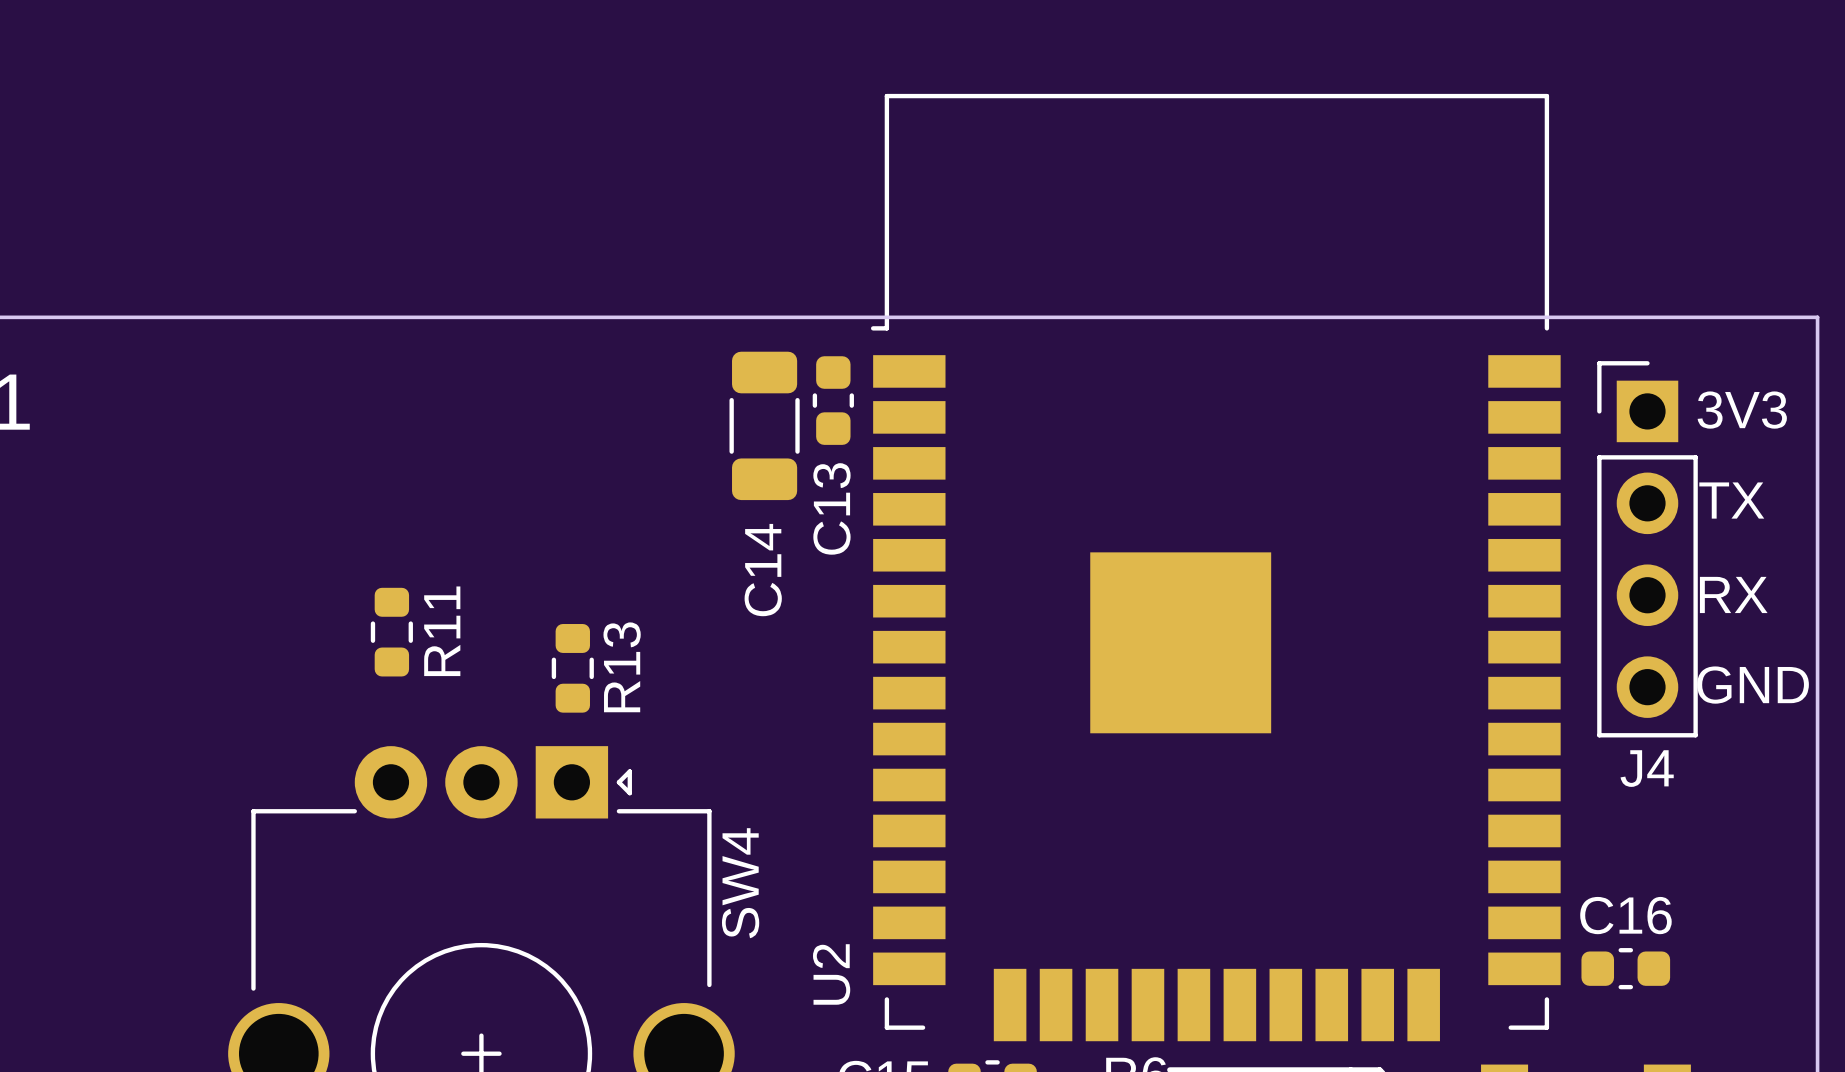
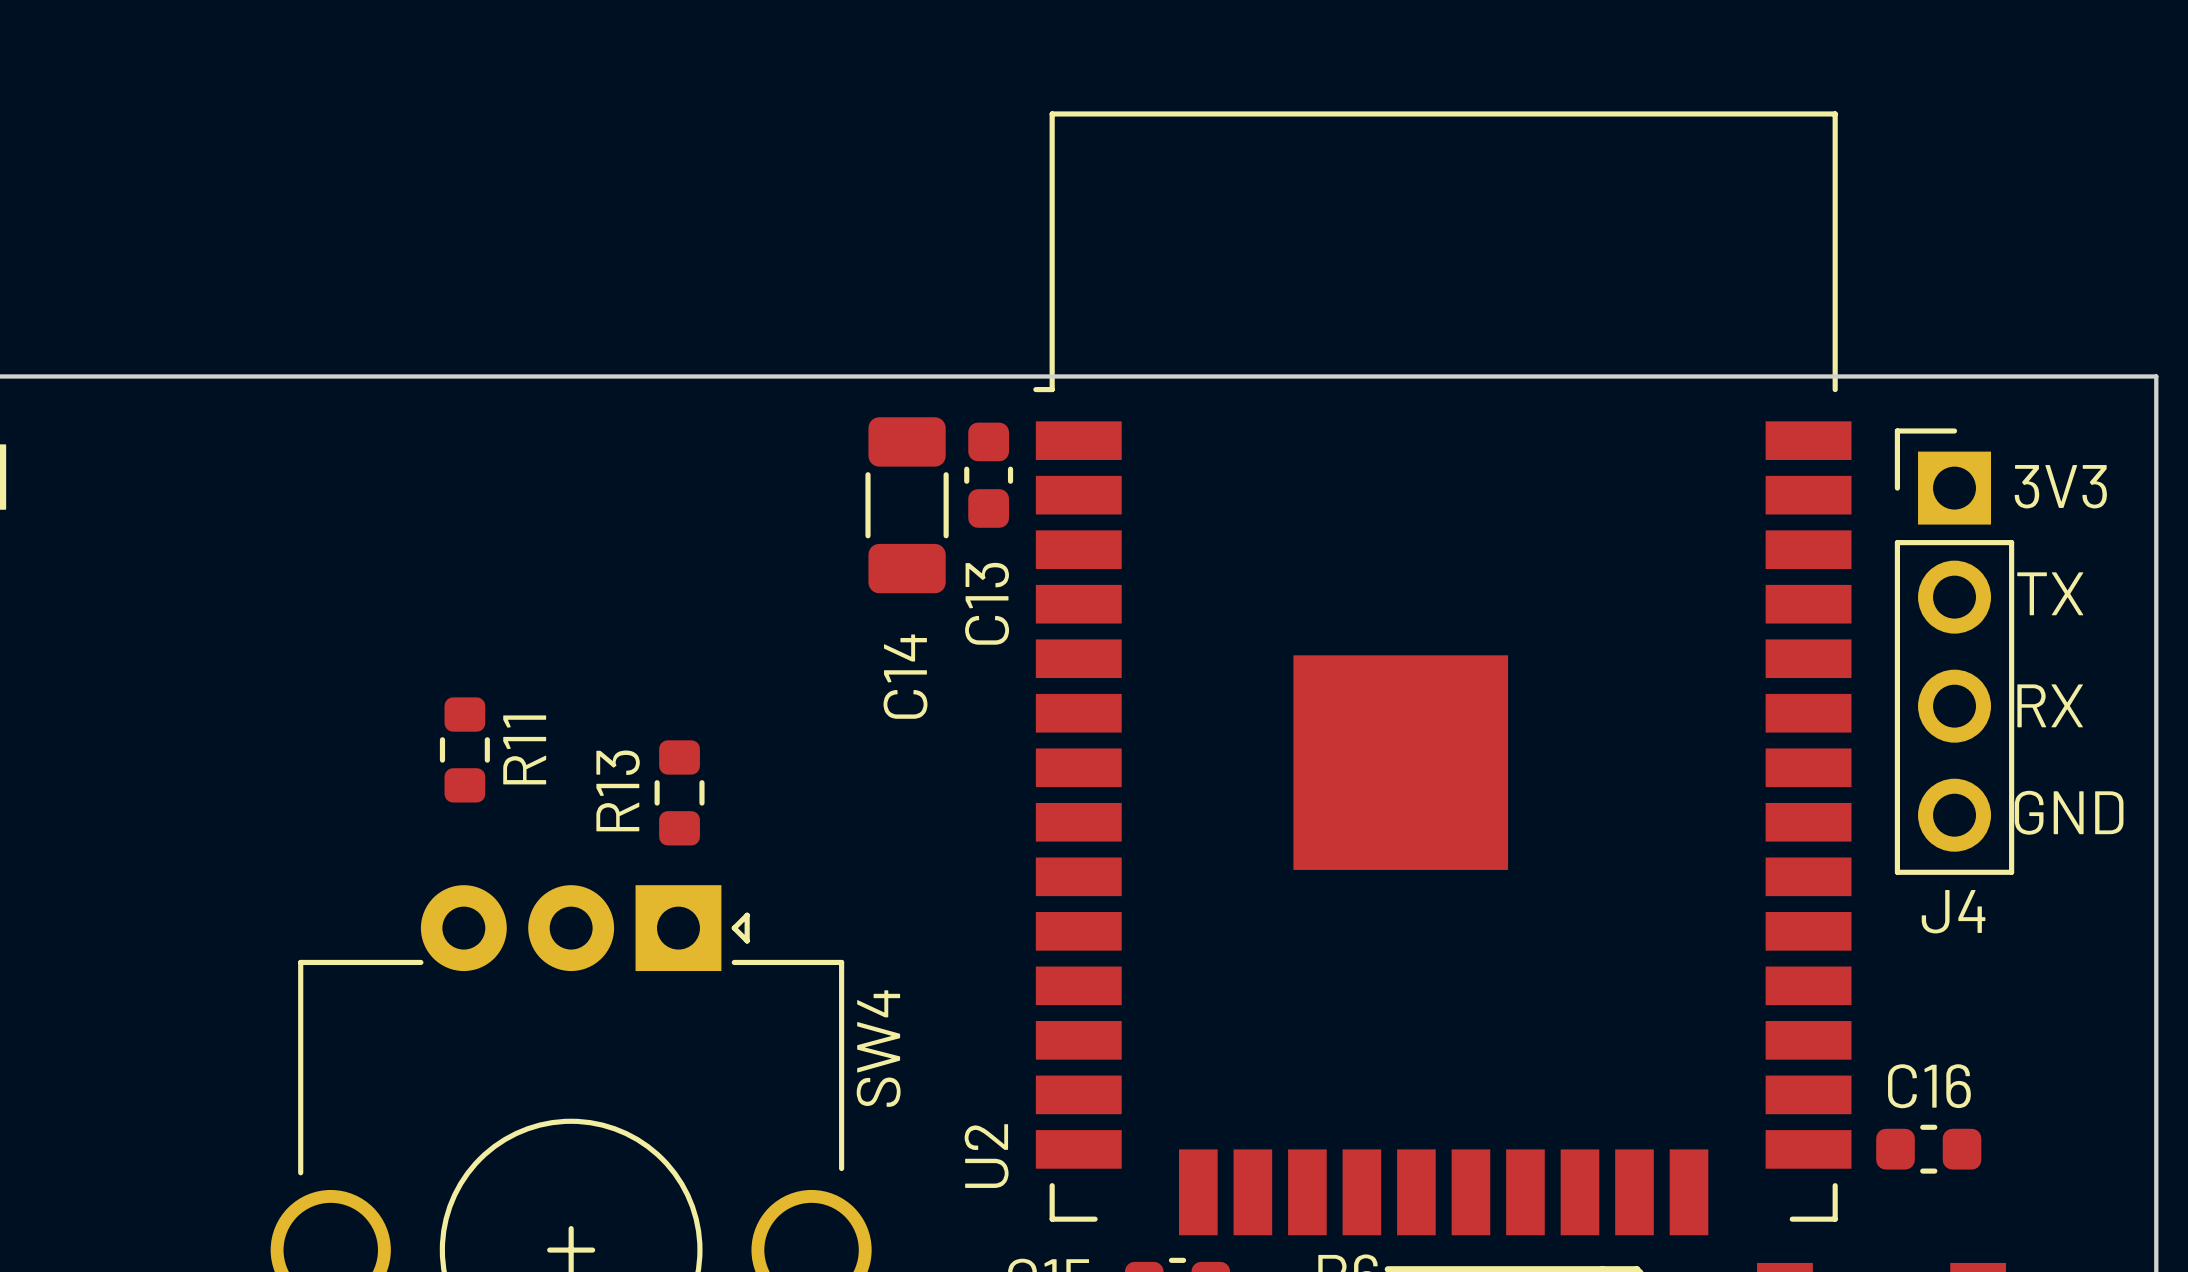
R13 name position: R13 (622, 667) -> R13 (618, 790)

